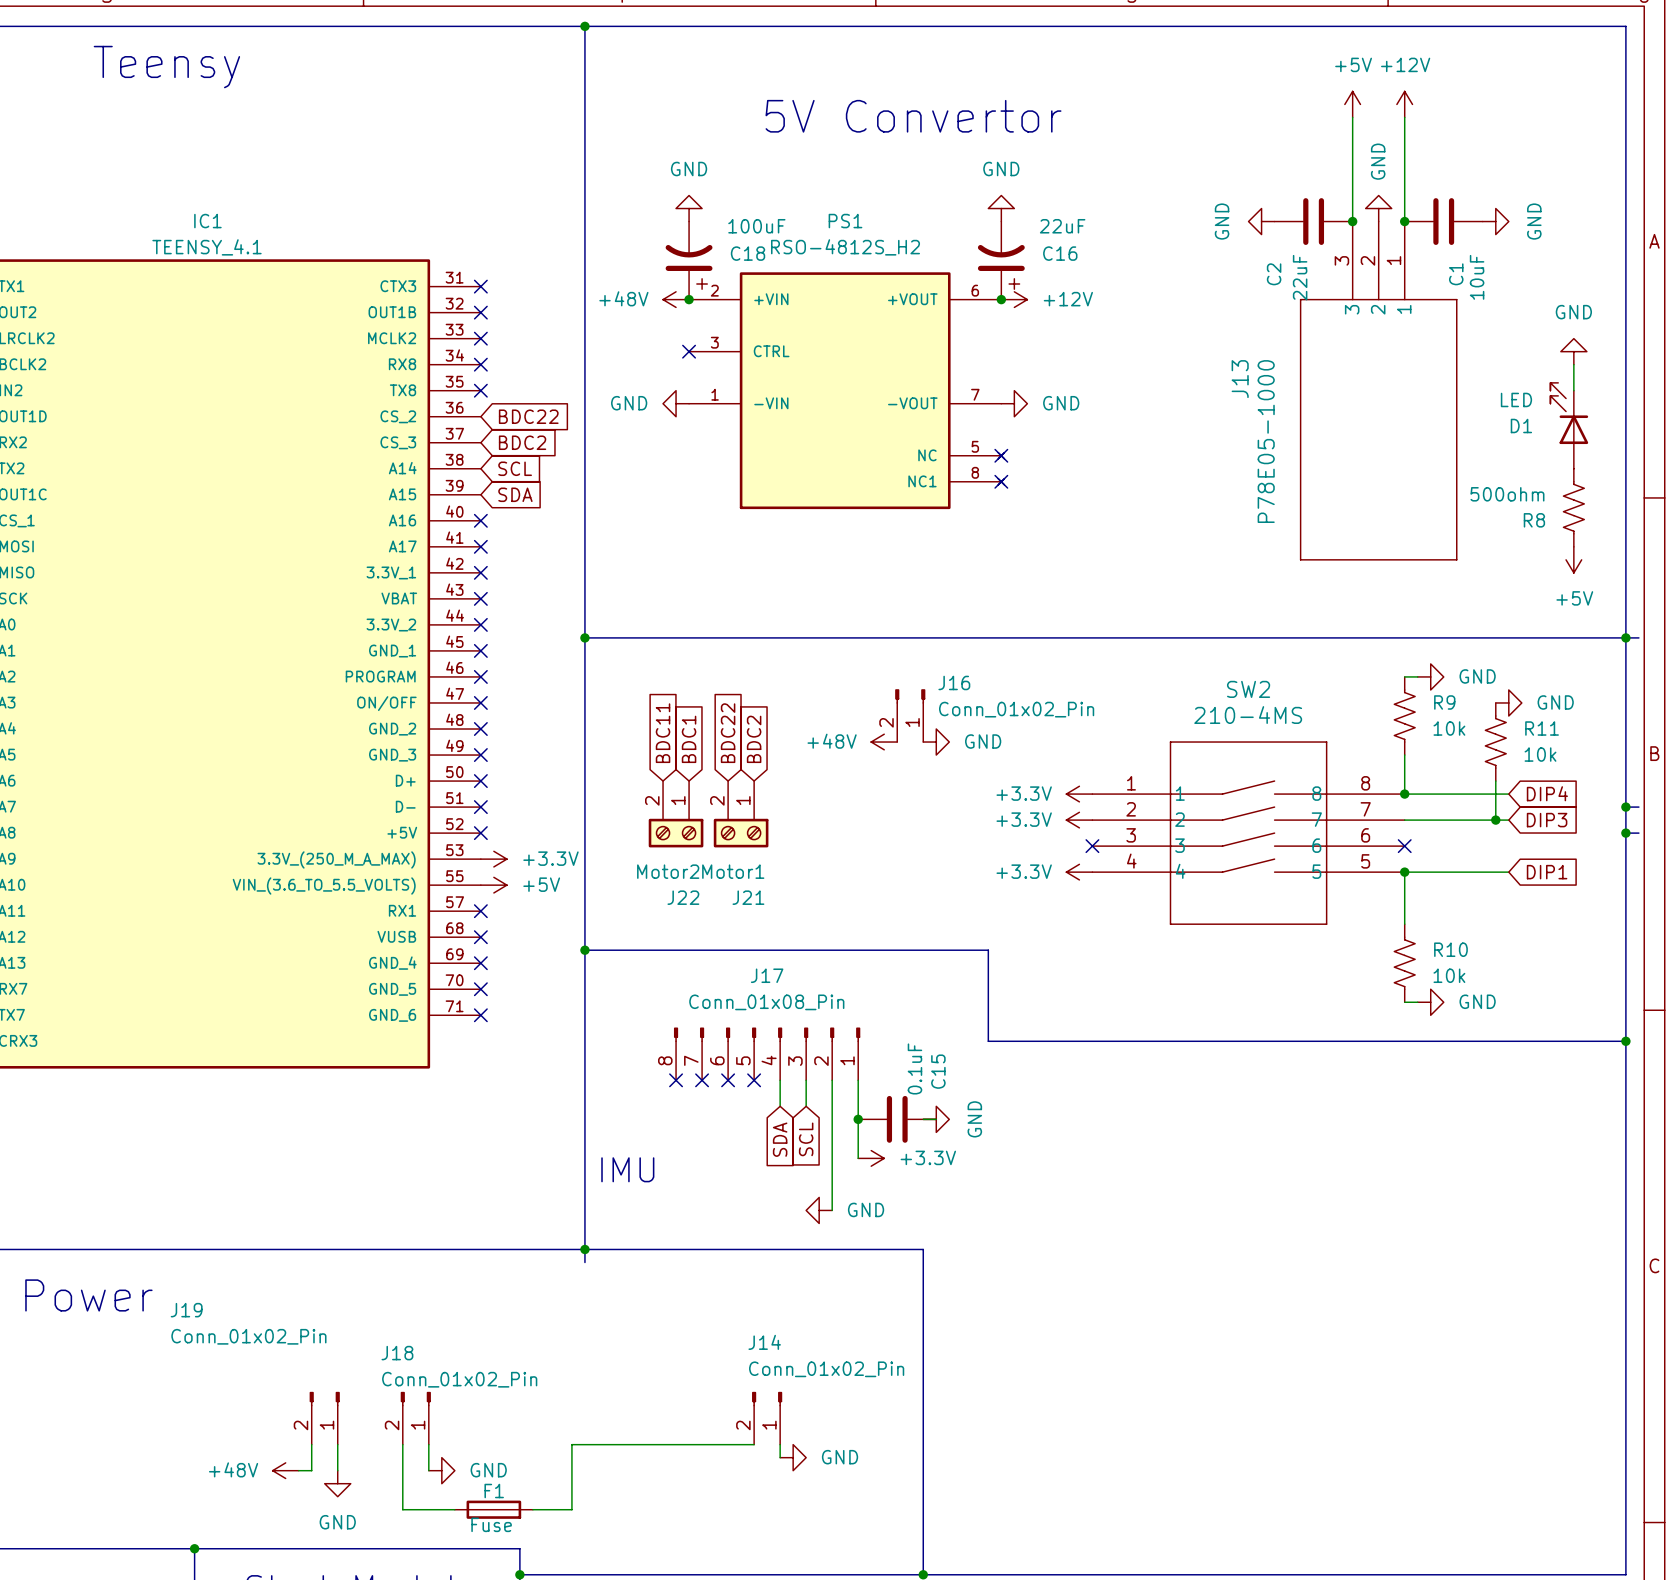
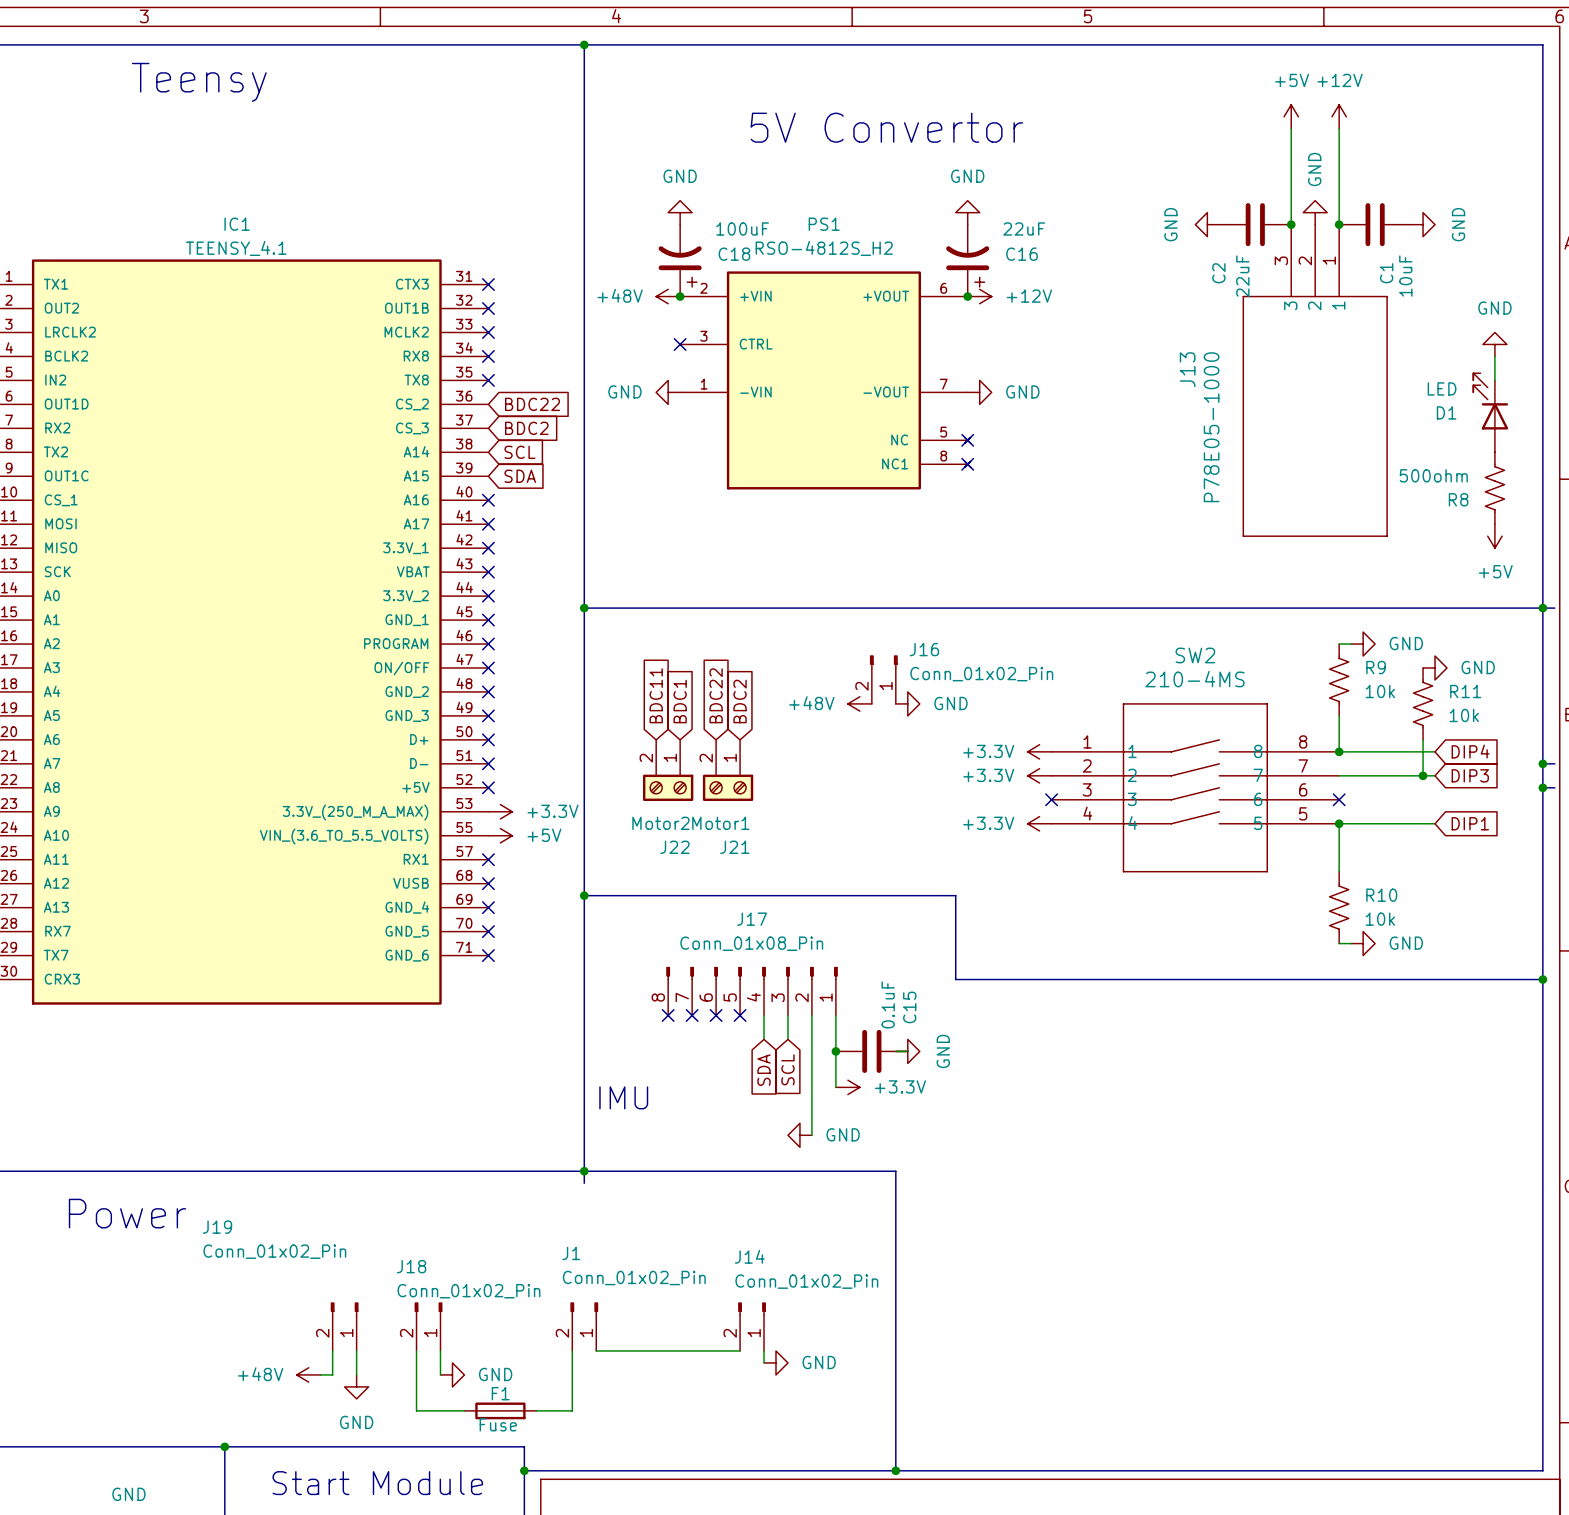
J1: none -> Conn_01x02_Pin (584, 1326)
wire: (571, 1444) (597, 1444) -> none

